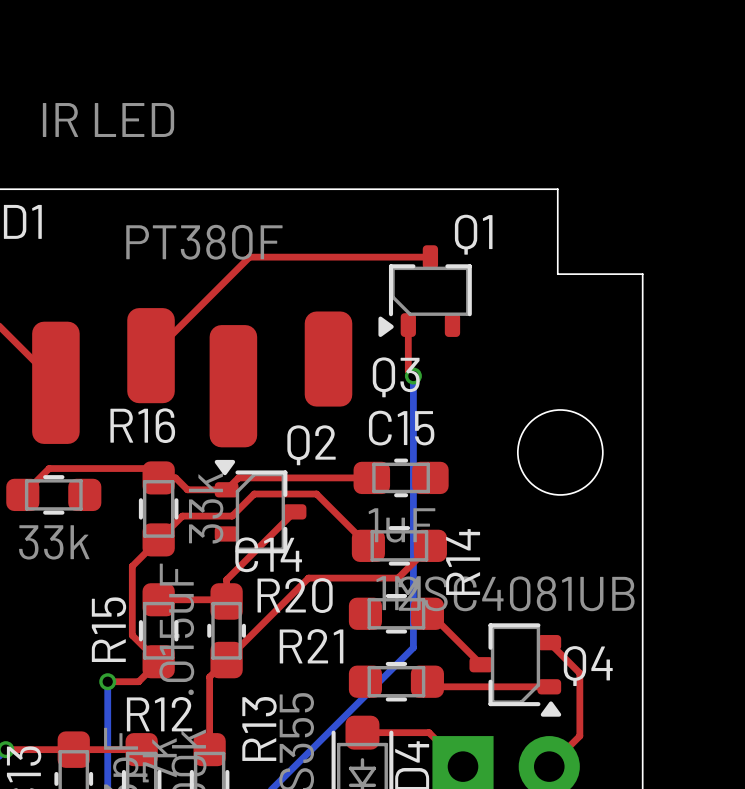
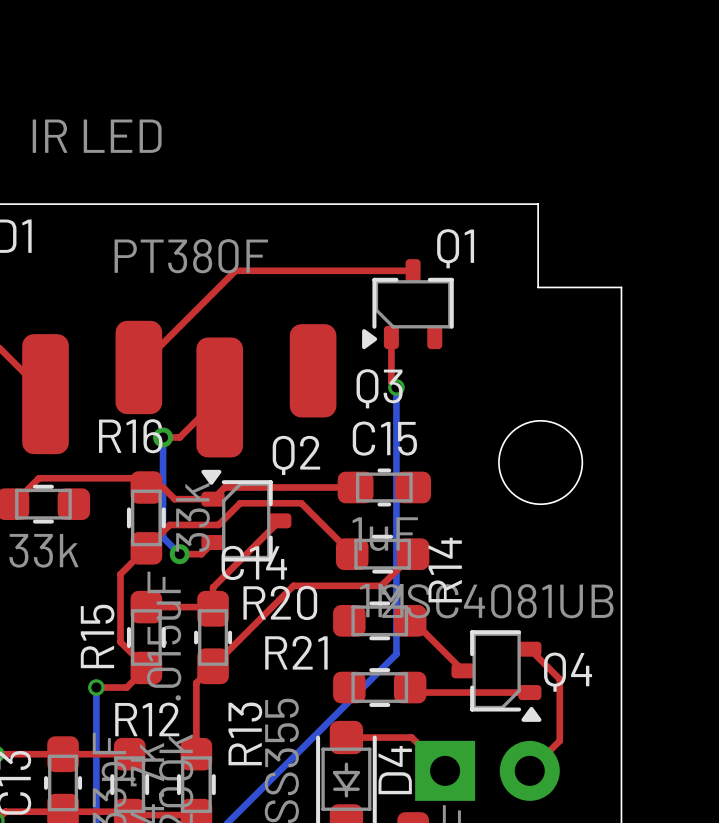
top track: none -> (219, 397) (179, 437) (163, 437)
bottom track: none -> (163, 437) (163, 537) (179, 554)
via: none -> (163, 437)
top track: none -> (213, 542) (201, 554) (179, 554)
via: none -> (179, 554)

